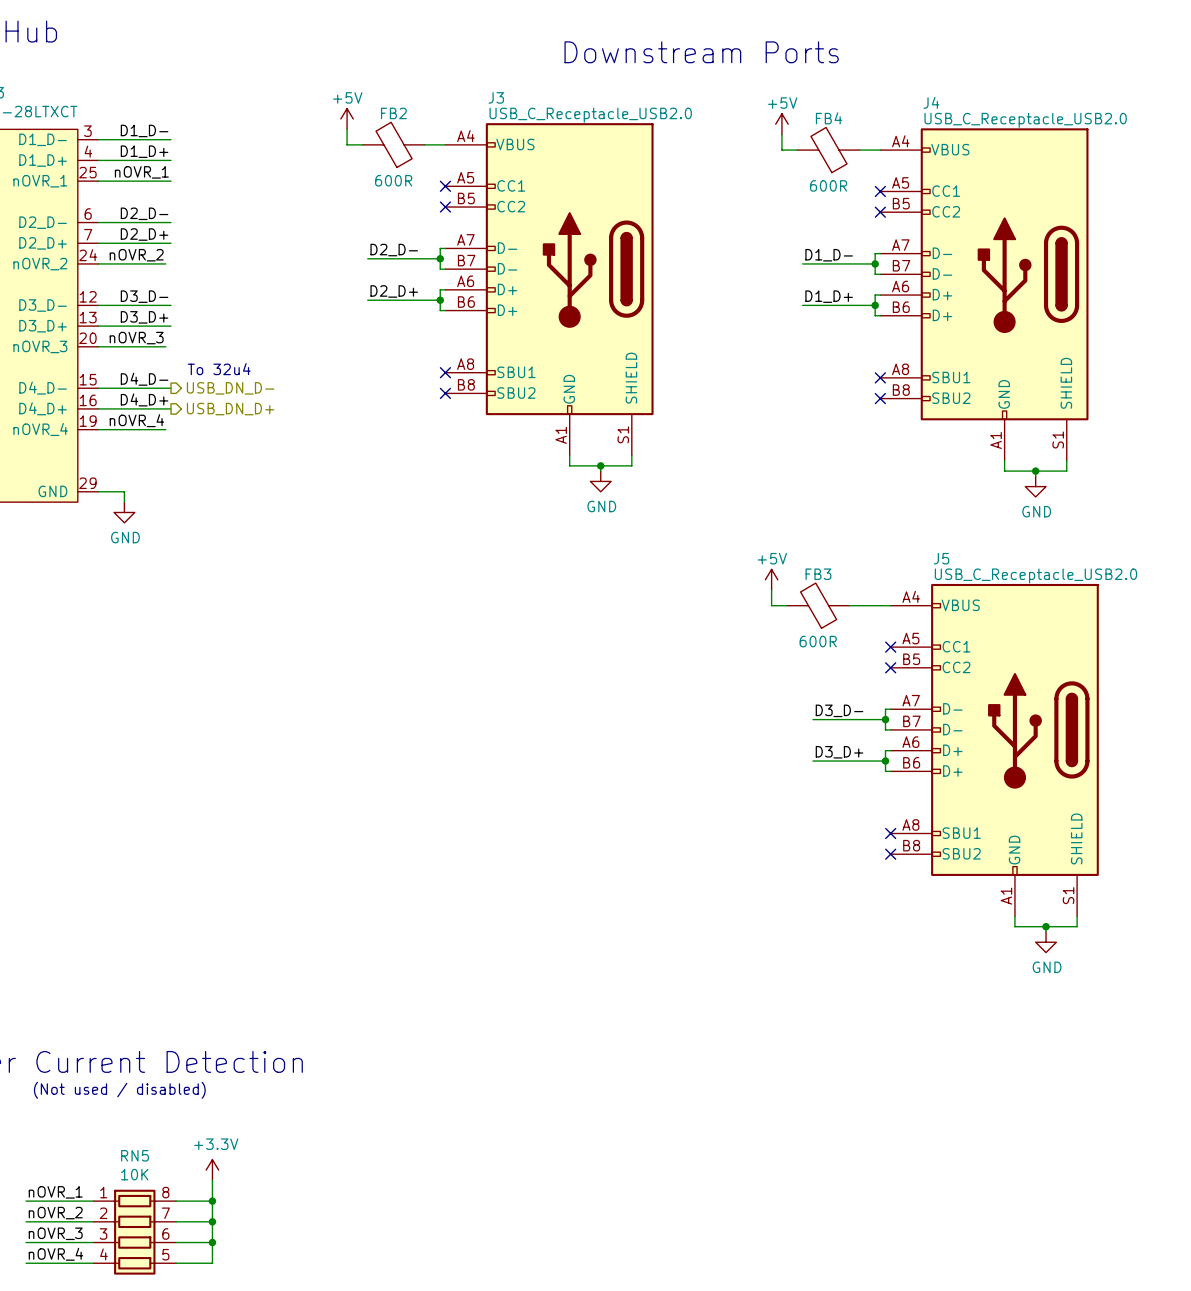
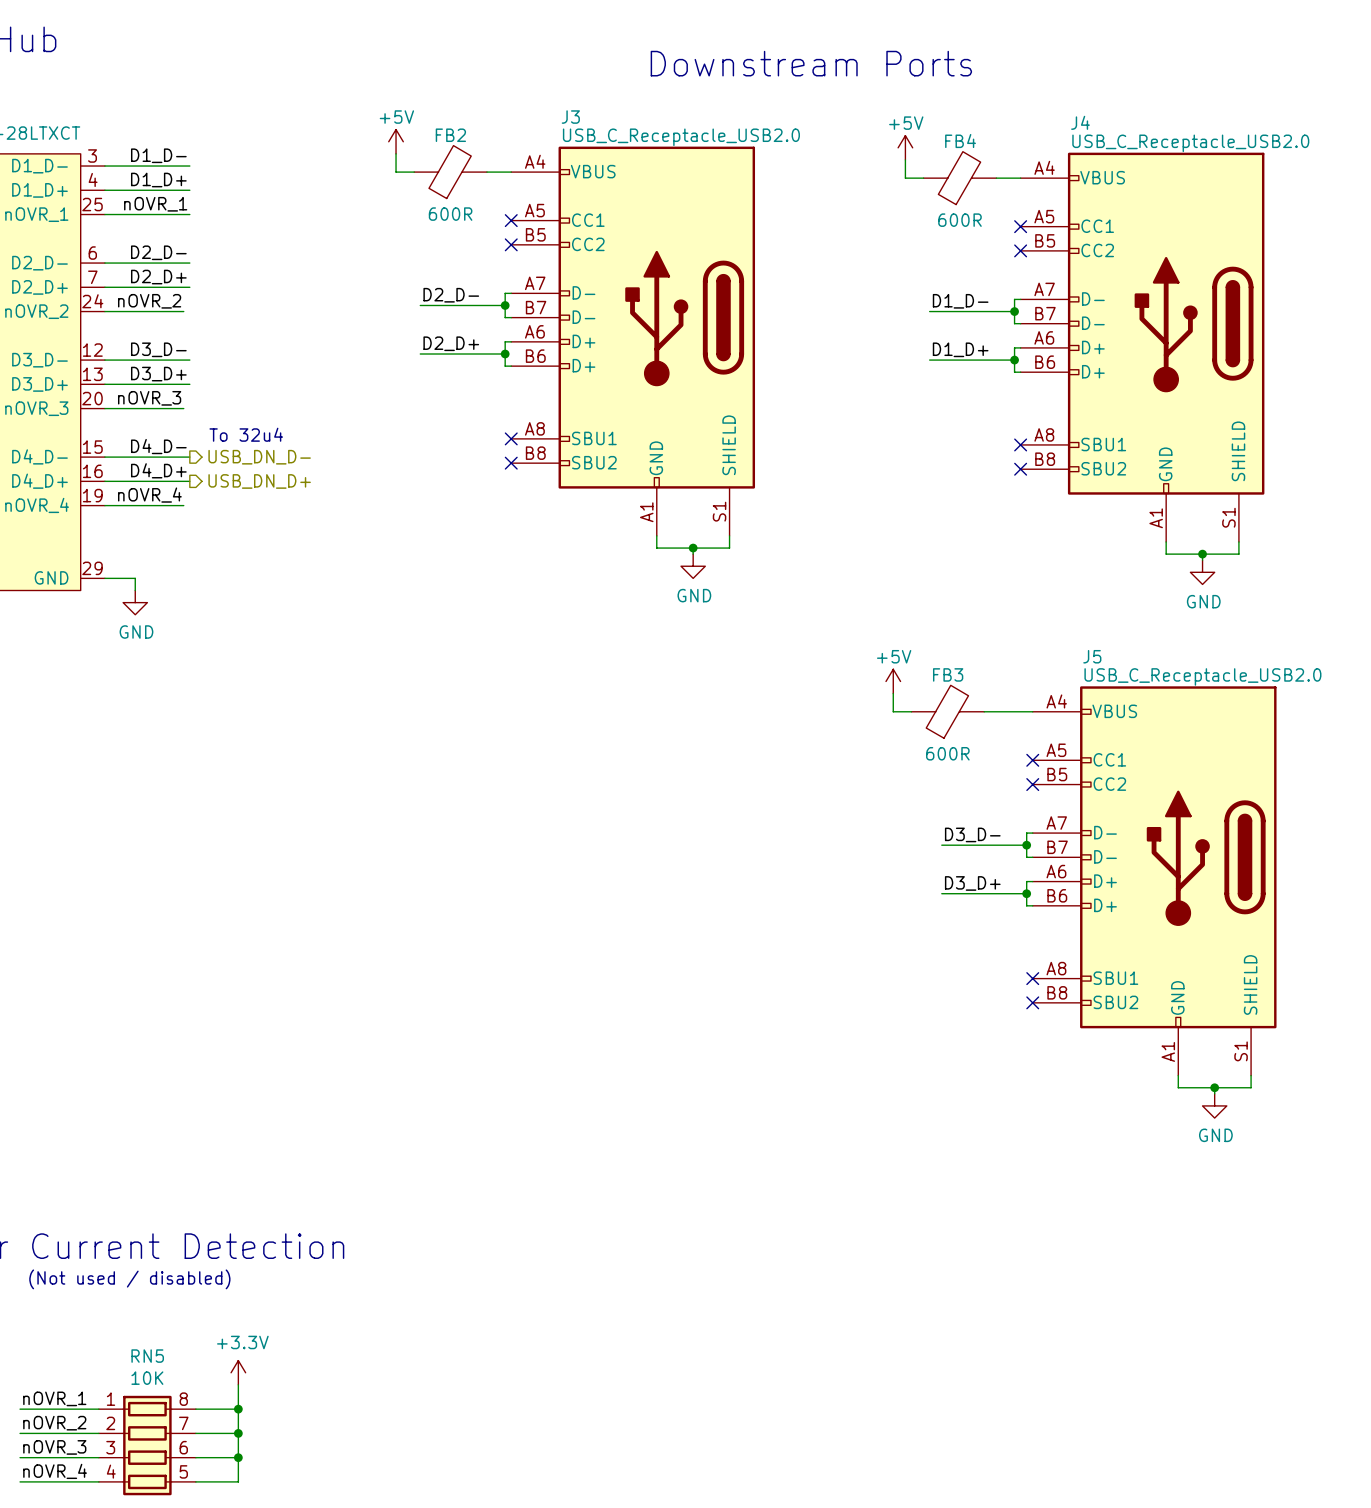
FB2 flip: as is (394, 144) -> left-right (450, 172)
FB4 flip: as is (828, 150) -> left-right (959, 178)
FB3 flip: as is (818, 605) -> left-right (947, 711)

